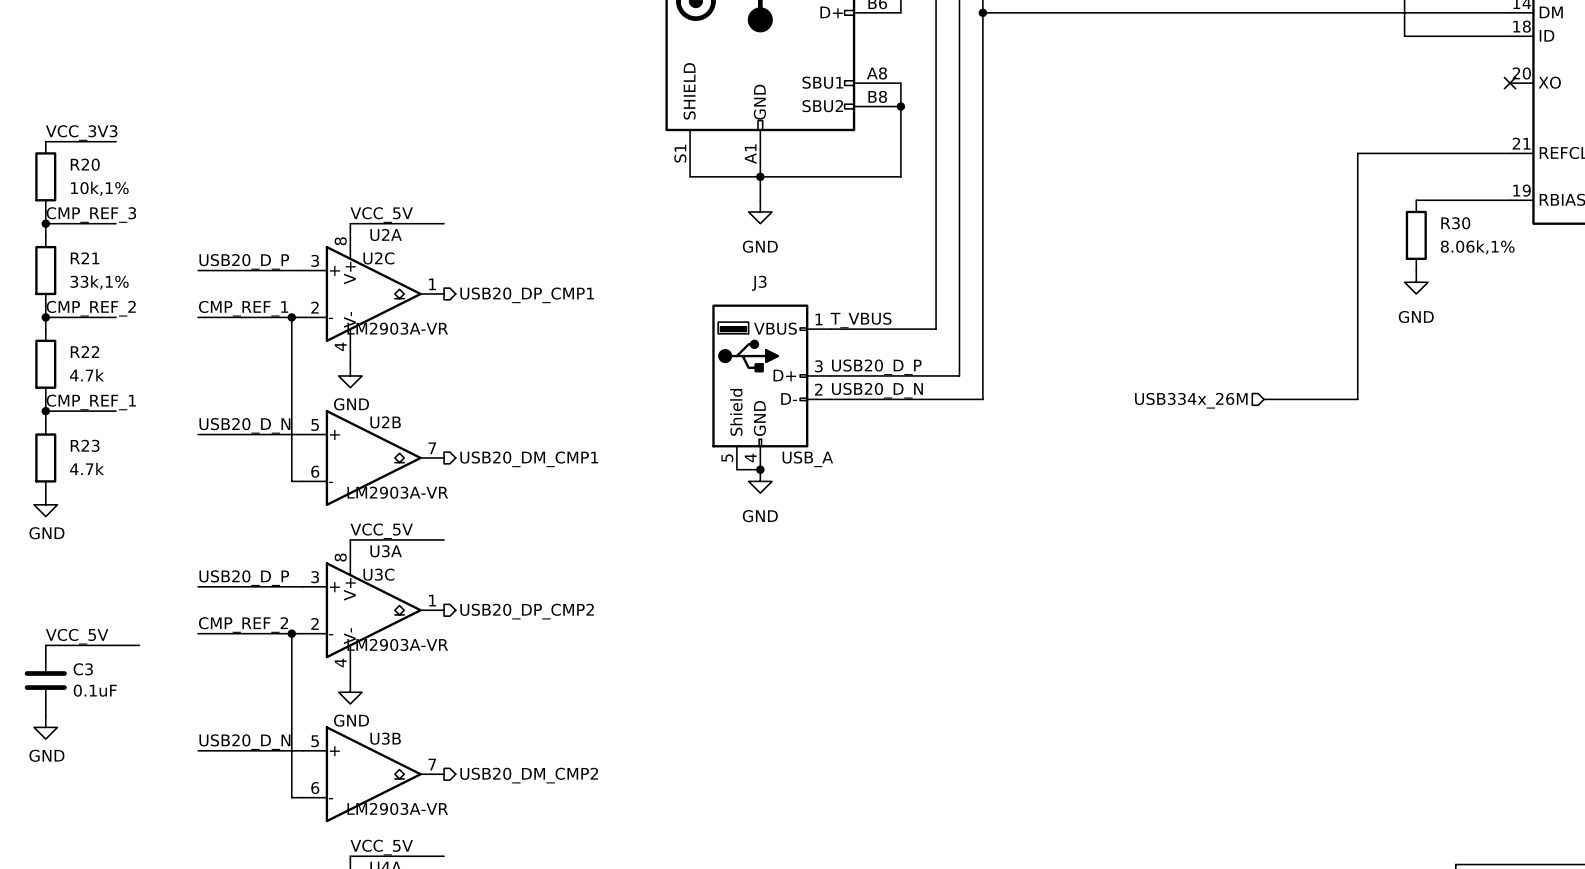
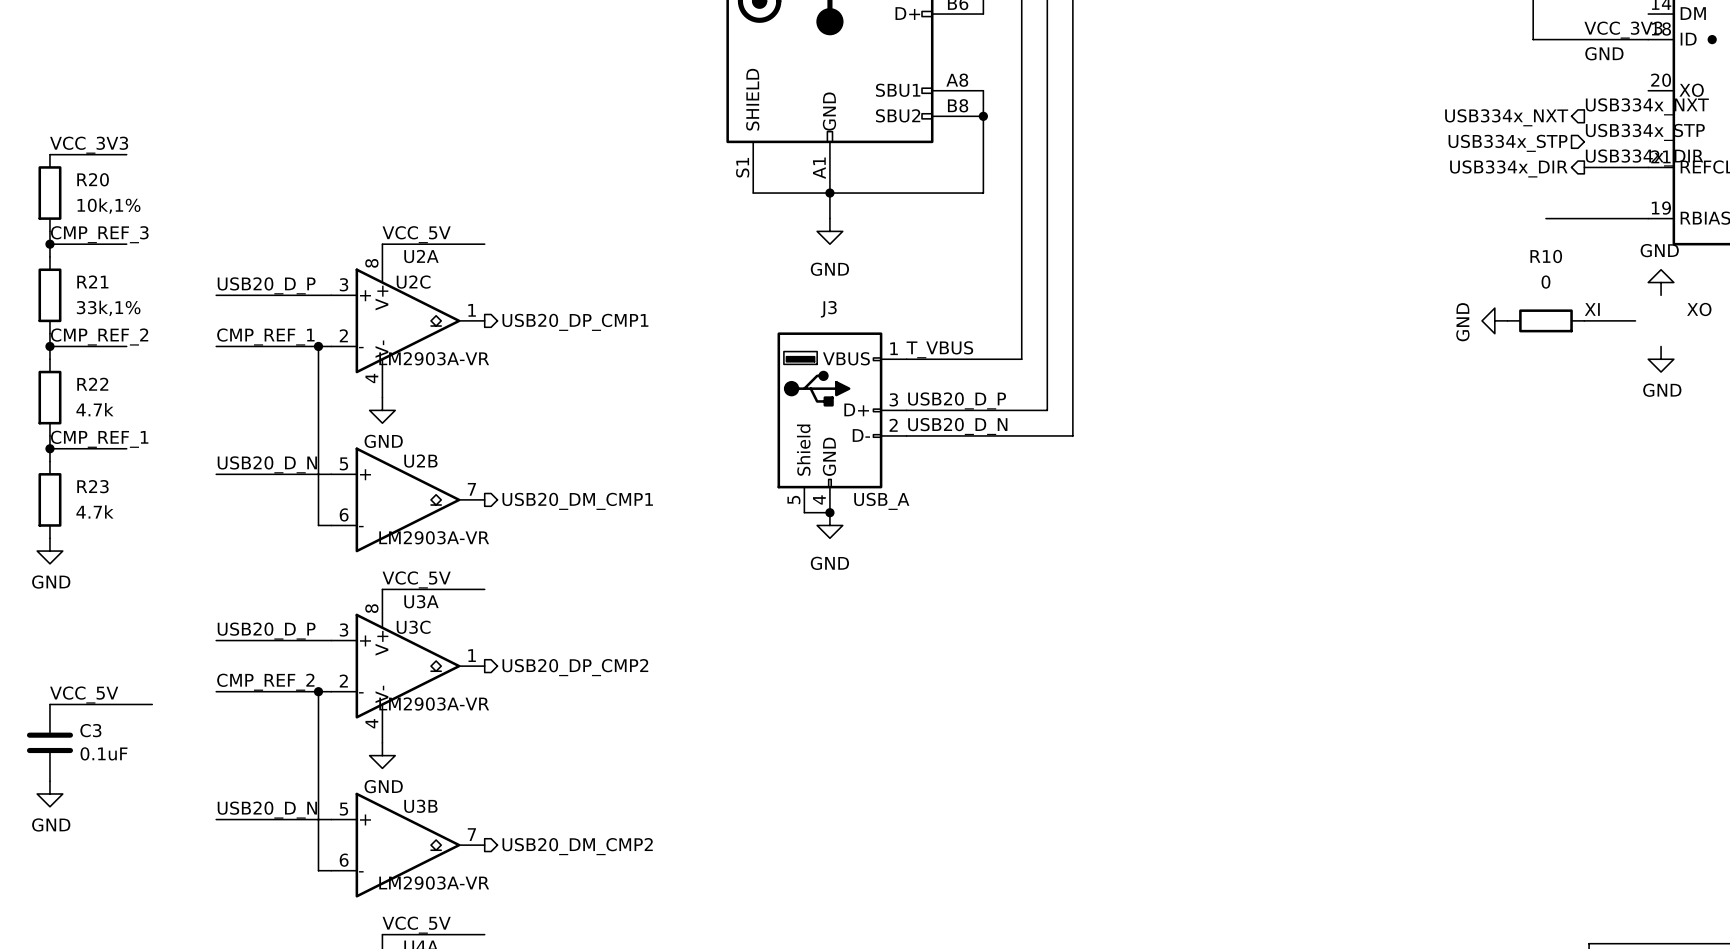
wire: (982, 12) (1510, 12) -> none
junction: (982, 12) -> none
label: none -> VCC_3V3 (1623, 30)
junction: none -> (1712, 39)
label: none -> GND (1604, 53)
no-connect mark: (1510, 83) -> none
label: none -> USB334x_NXT (1647, 106)
hierarchical label: none -> USB334x_NXT (1506, 117)
label: none -> USB334x_STP (1645, 132)
hierarchical label: none -> USB334x_STP (1508, 143)
label: none -> USB334x_DIR (1644, 158)
wire: (1451, 153) (1357, 153) (1357, 399) (1264, 399) -> none
hierarchical label: none -> USB334x_DIR (1508, 168)
R30: 8.06k,1% (1416, 235) -> none
power symbol: none -> GND (1661, 282)
power symbol rotation: 0° (1416, 282) -> 90° clockwise (1494, 320)
power symbol position: GND (1416, 282) -> GND (1494, 320)
label: none -> XI (1592, 309)
label: none -> XO (1699, 309)
R10: none -> 0 (1545, 320)
wire: none -> (1584, 320) (1635, 320)
power symbol: none -> GND (1661, 359)
hierarchical label: USB334x_26M (1191, 400) -> none

